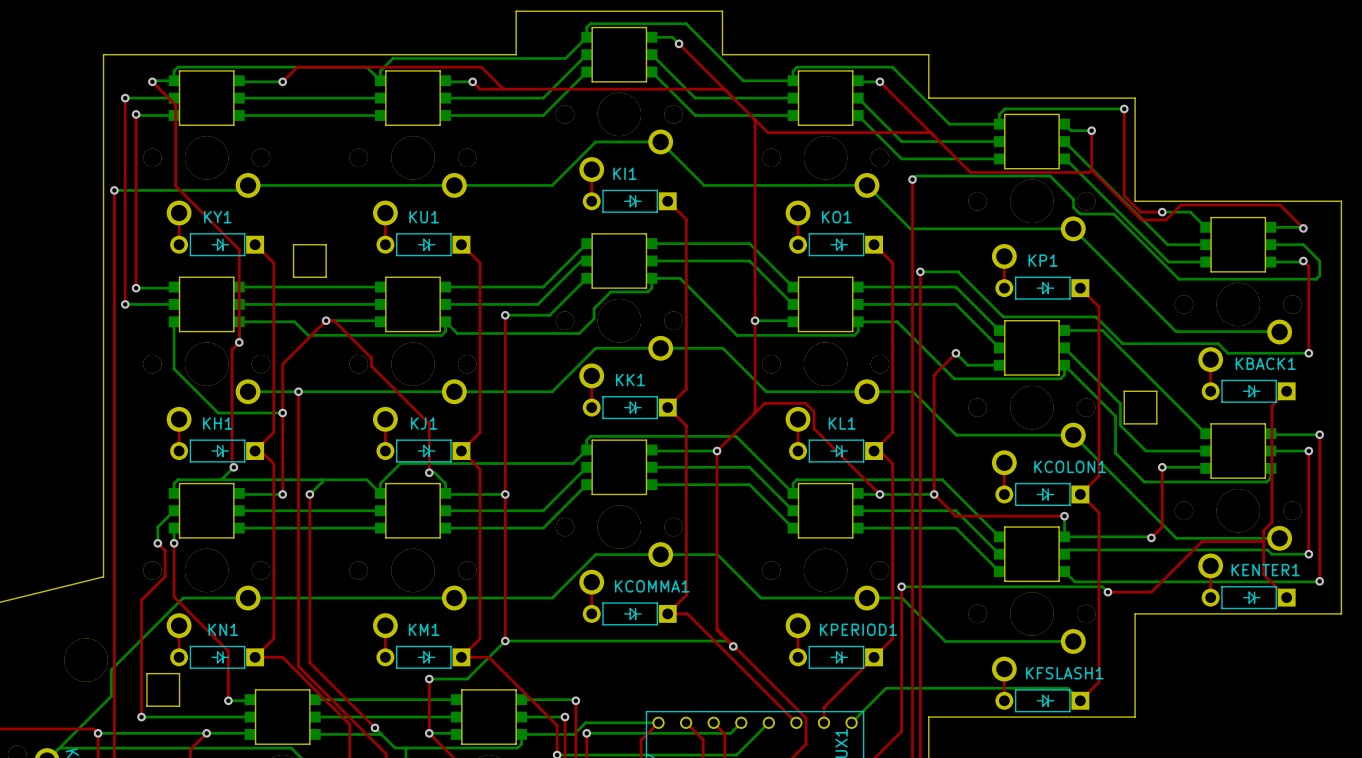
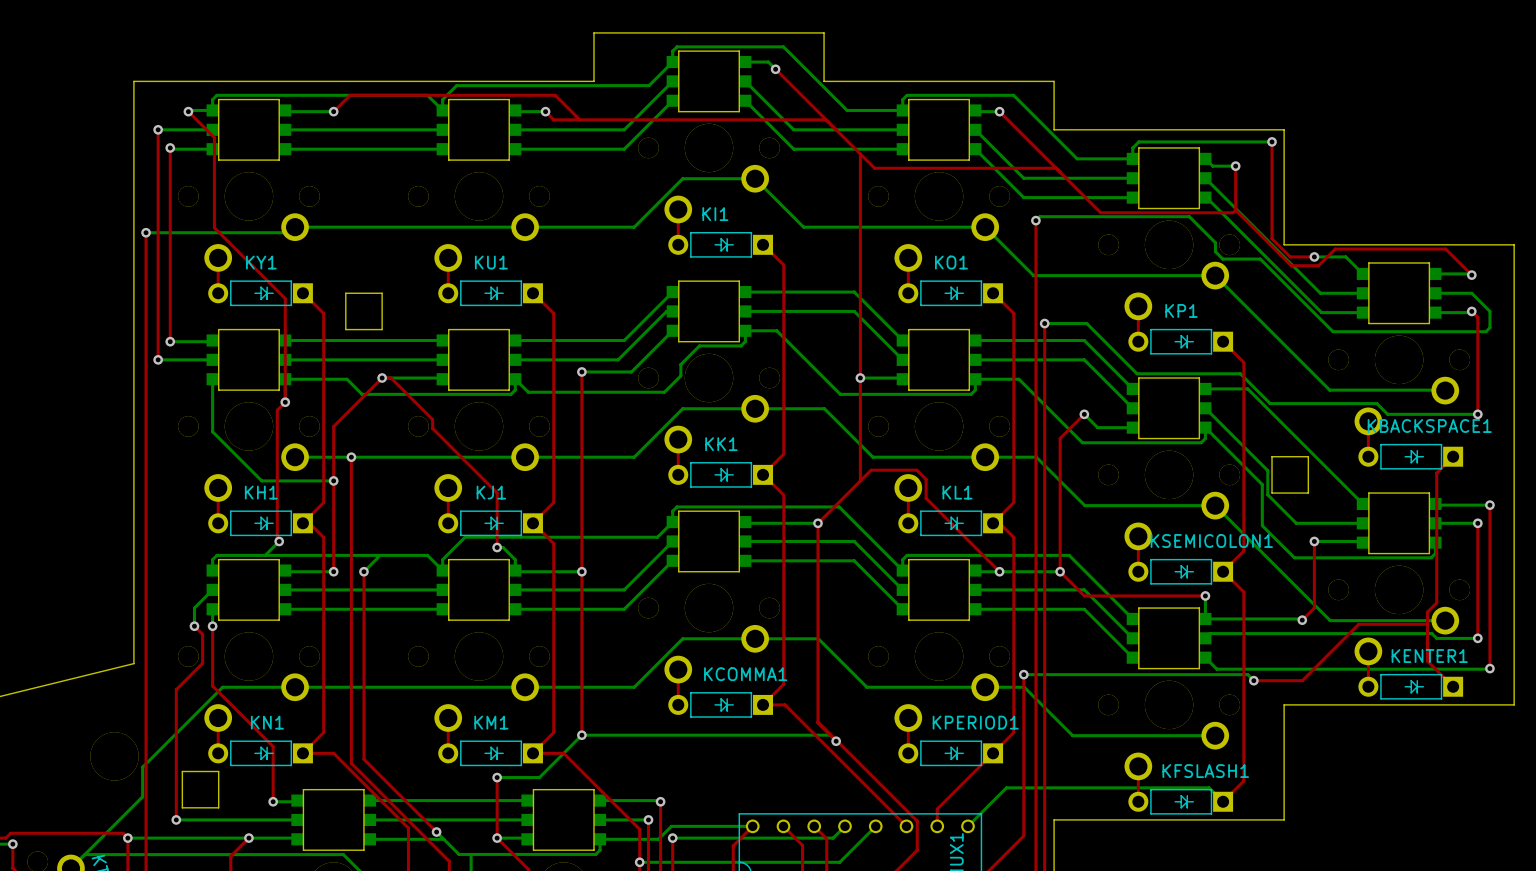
KBACK1 name: KBACK1 (1265, 363) -> KBACKSPACE1 (1429, 425)
KCOLON1 name: KCOLON1 (1070, 466) -> KSEMICOLON1 (1211, 541)

